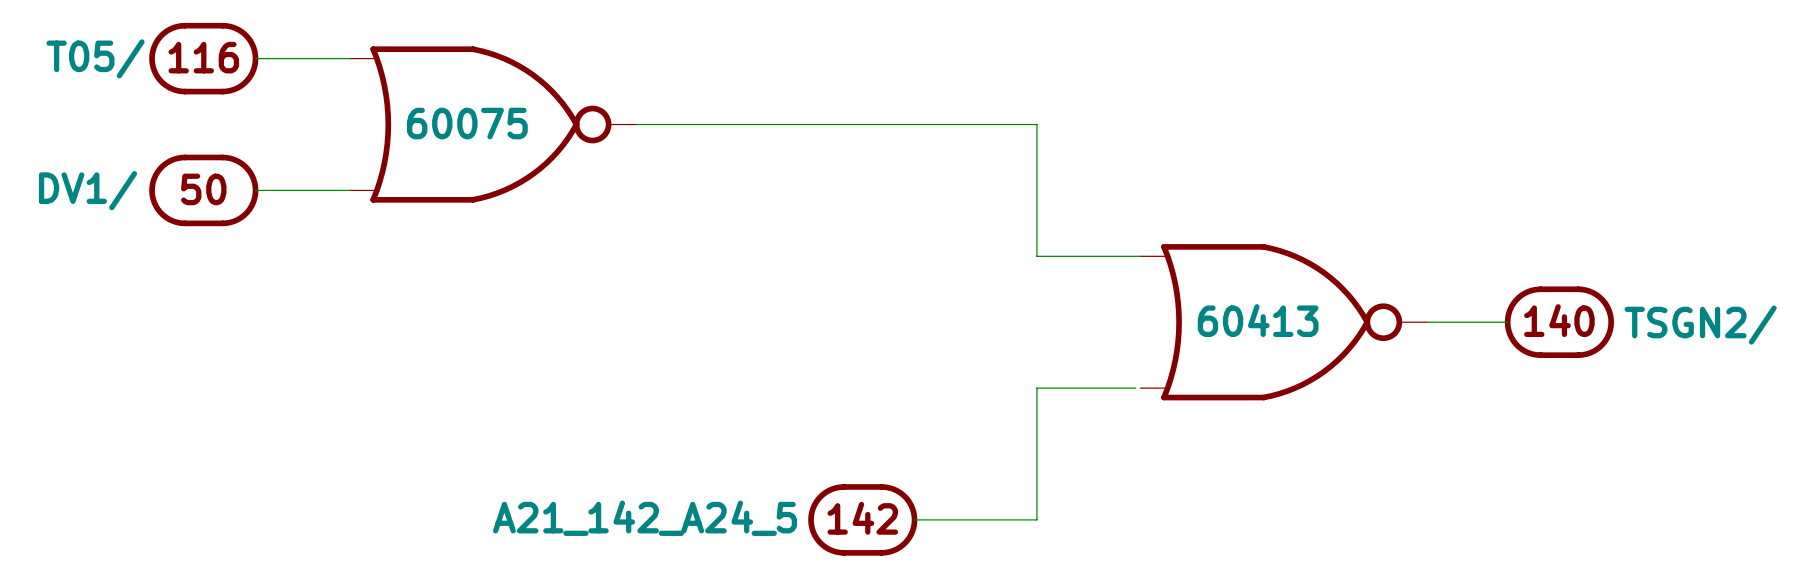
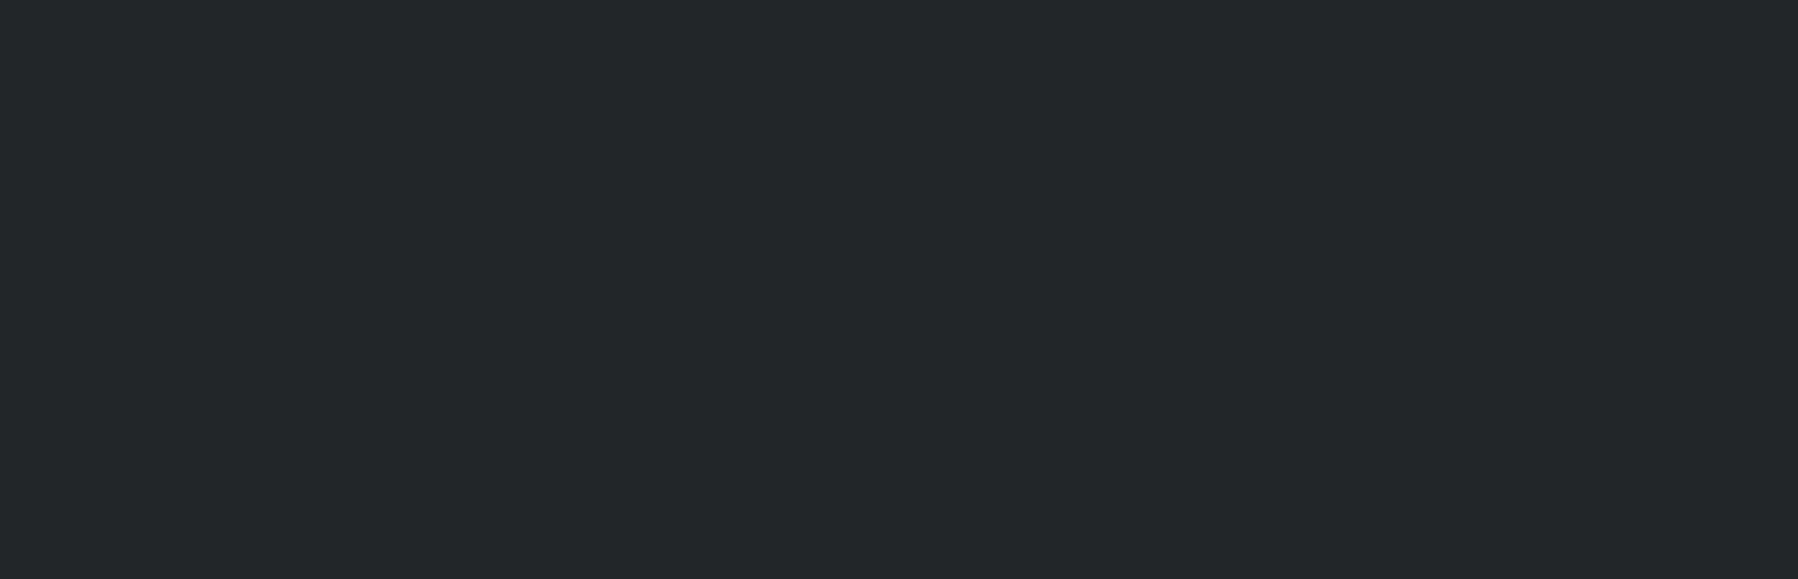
part: (203, 58) -> none
wire: (255, 58) (349, 58) -> none
part: (493, 124) -> none
wire: (636, 124) (1036, 124) (1036, 256) (1140, 256) -> none
part: (203, 190) -> none
wire: (255, 190) (349, 190) -> none
part: (1284, 322) -> none
wire: (1427, 322) (1507, 322) -> none
part: (1559, 322) -> none
wire: (1135, 388) (1036, 388) (1036, 519) (914, 519) -> none
part: (862, 519) -> none

